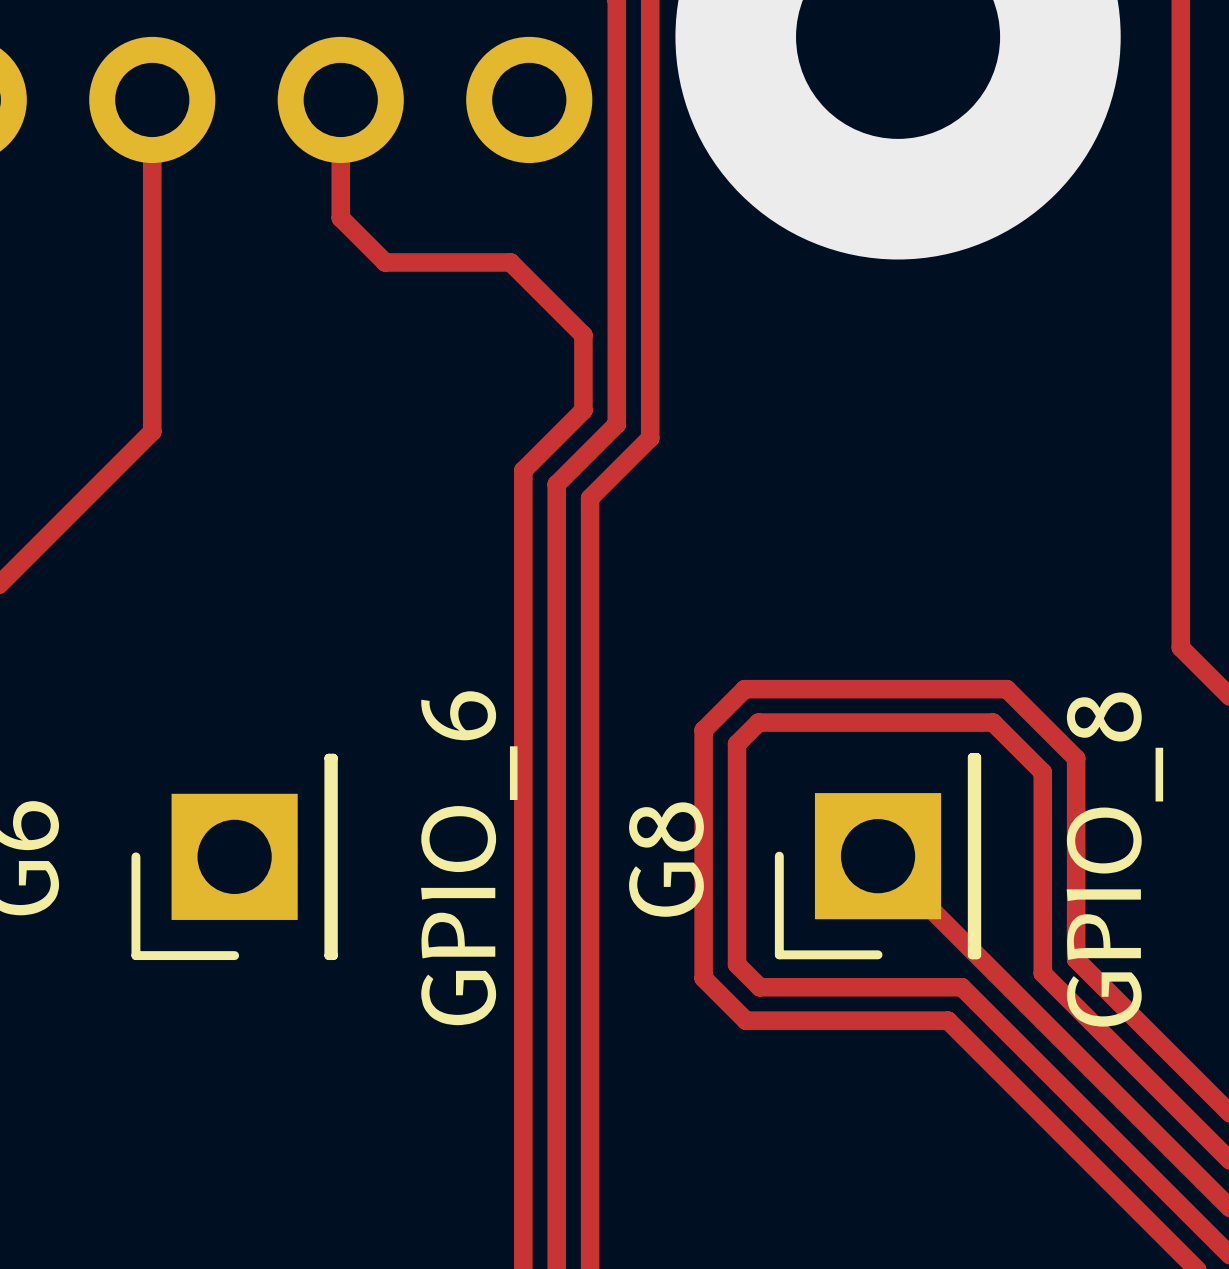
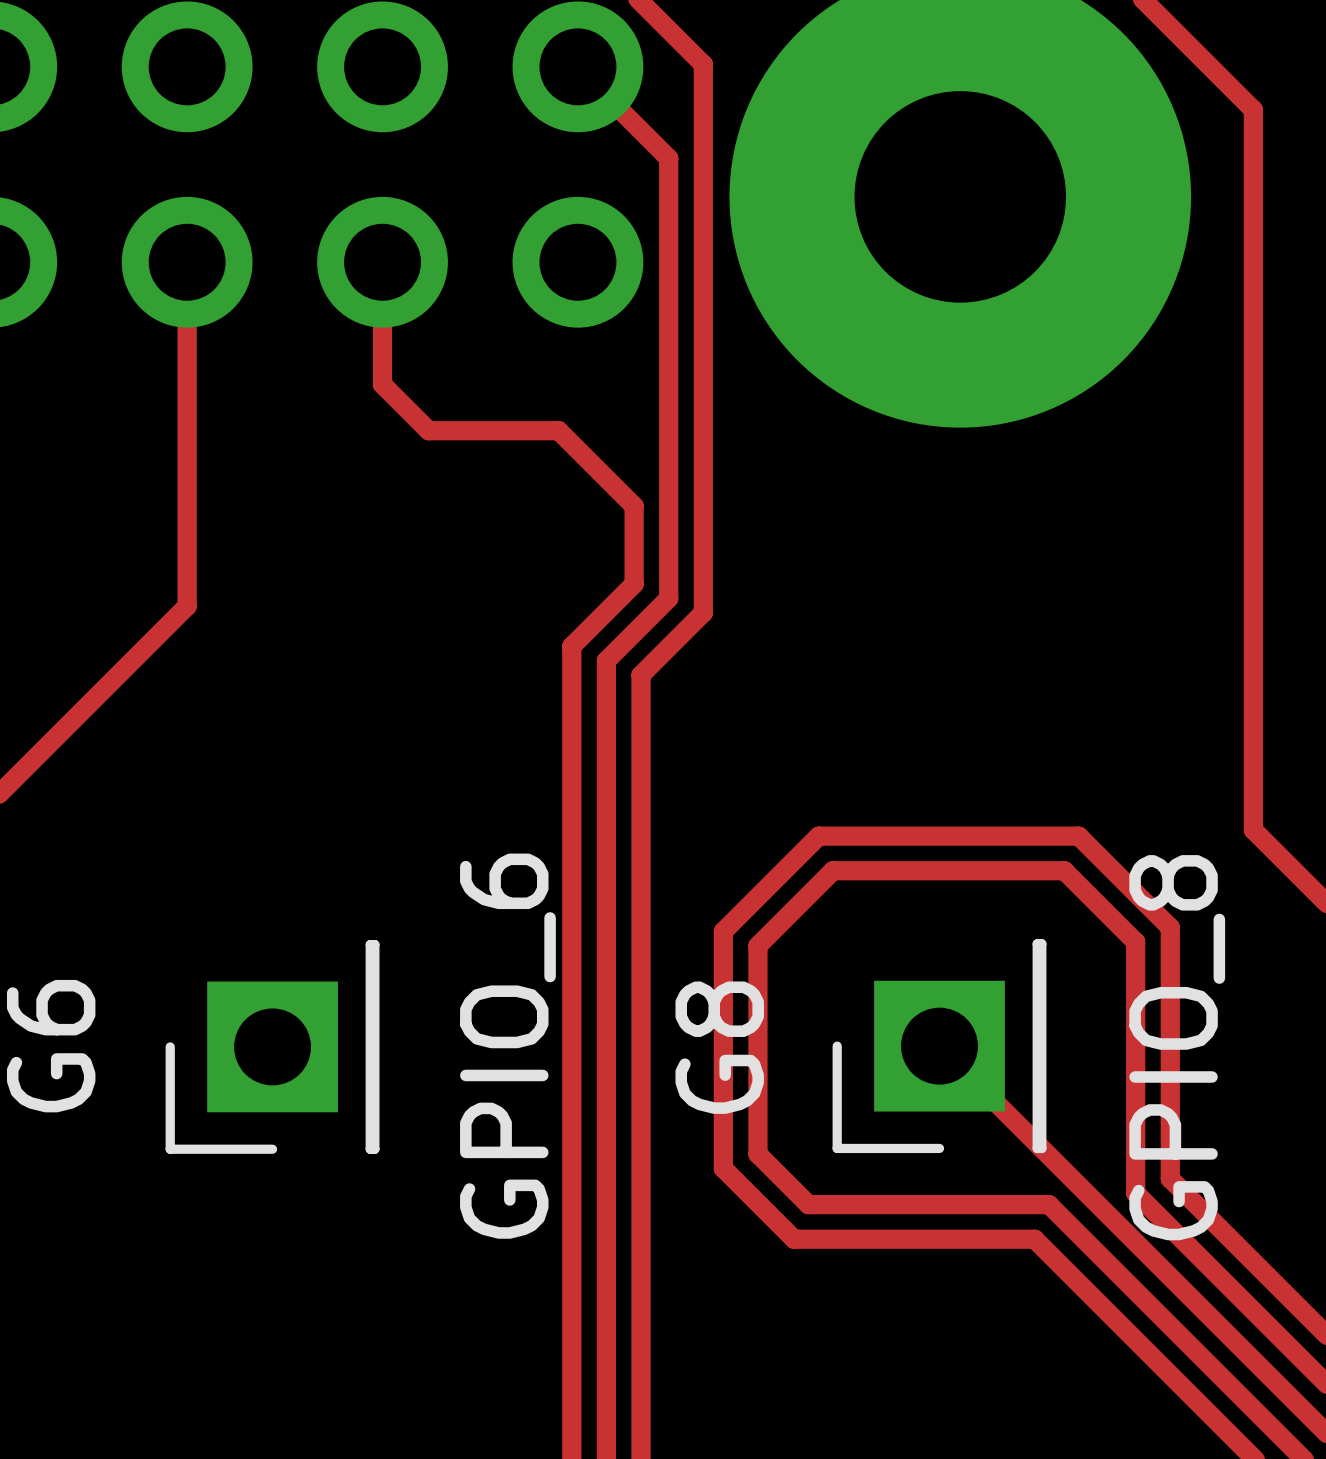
track: (1100, 984) (1076, 959) (1076, 758) (1006, 689) (744, 689) (703, 730) (703, 978) (745, 1020) (948, 1020) (969, 1042) -> (1170, 1178) (1170, 927) (1078, 836) (818, 836) (723, 931) (723, 1168) (794, 1239) (1034, 1239)
track: (1067, 997) (1042, 973) (1042, 772) (993, 722) (758, 722) (737, 744) (737, 964) (759, 987) (961, 987) (983, 1009) -> (1135, 1193) (1135, 942) (1064, 870) (833, 870) (757, 945) (757, 1154) (808, 1204) (1049, 1204)

